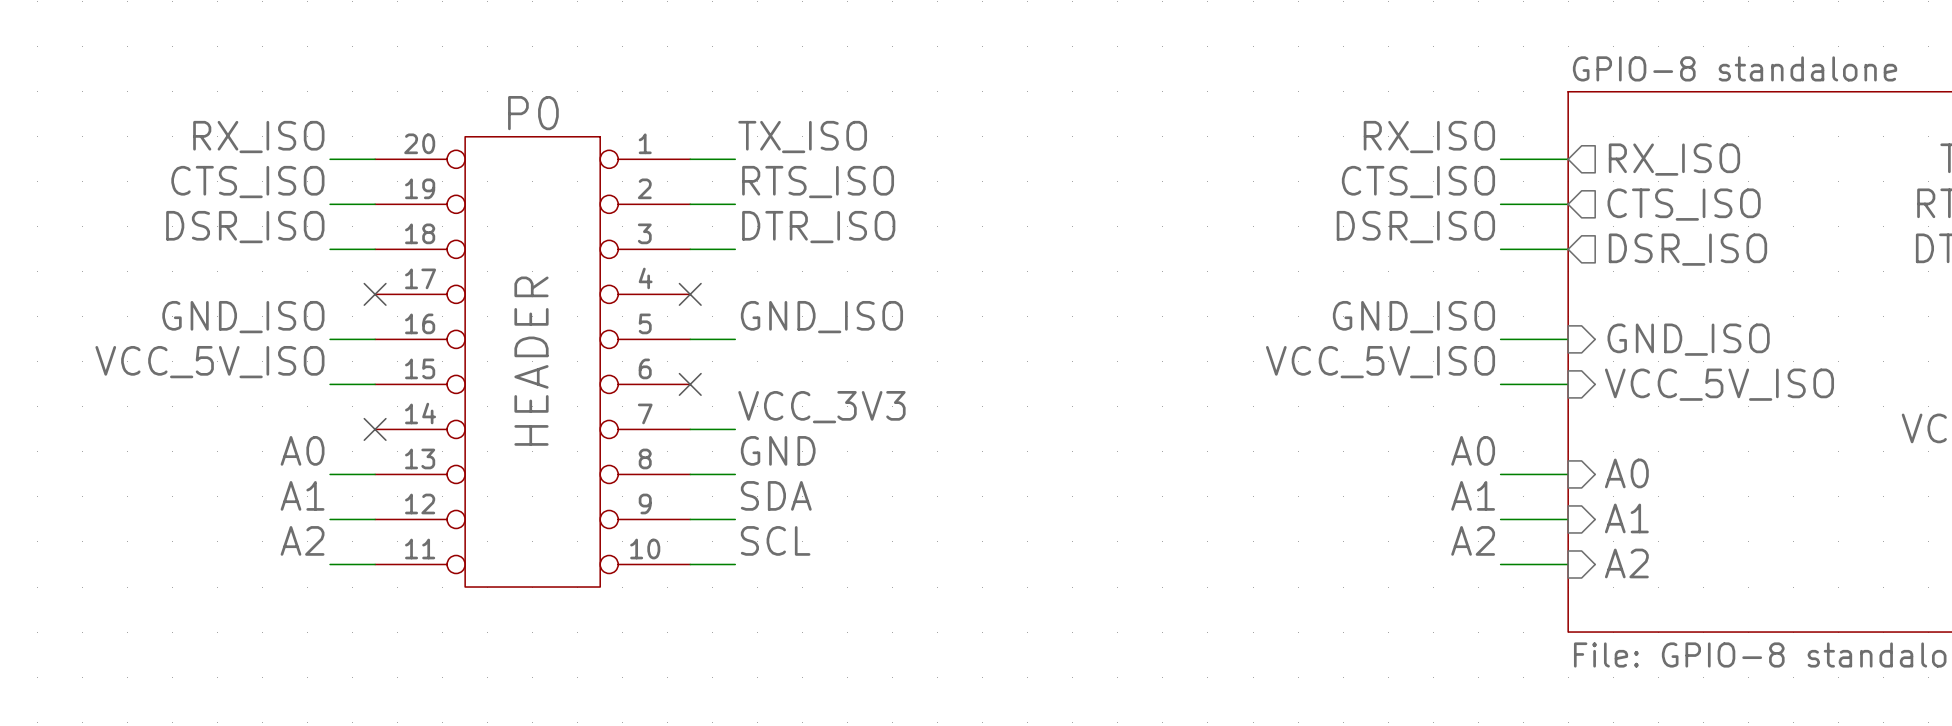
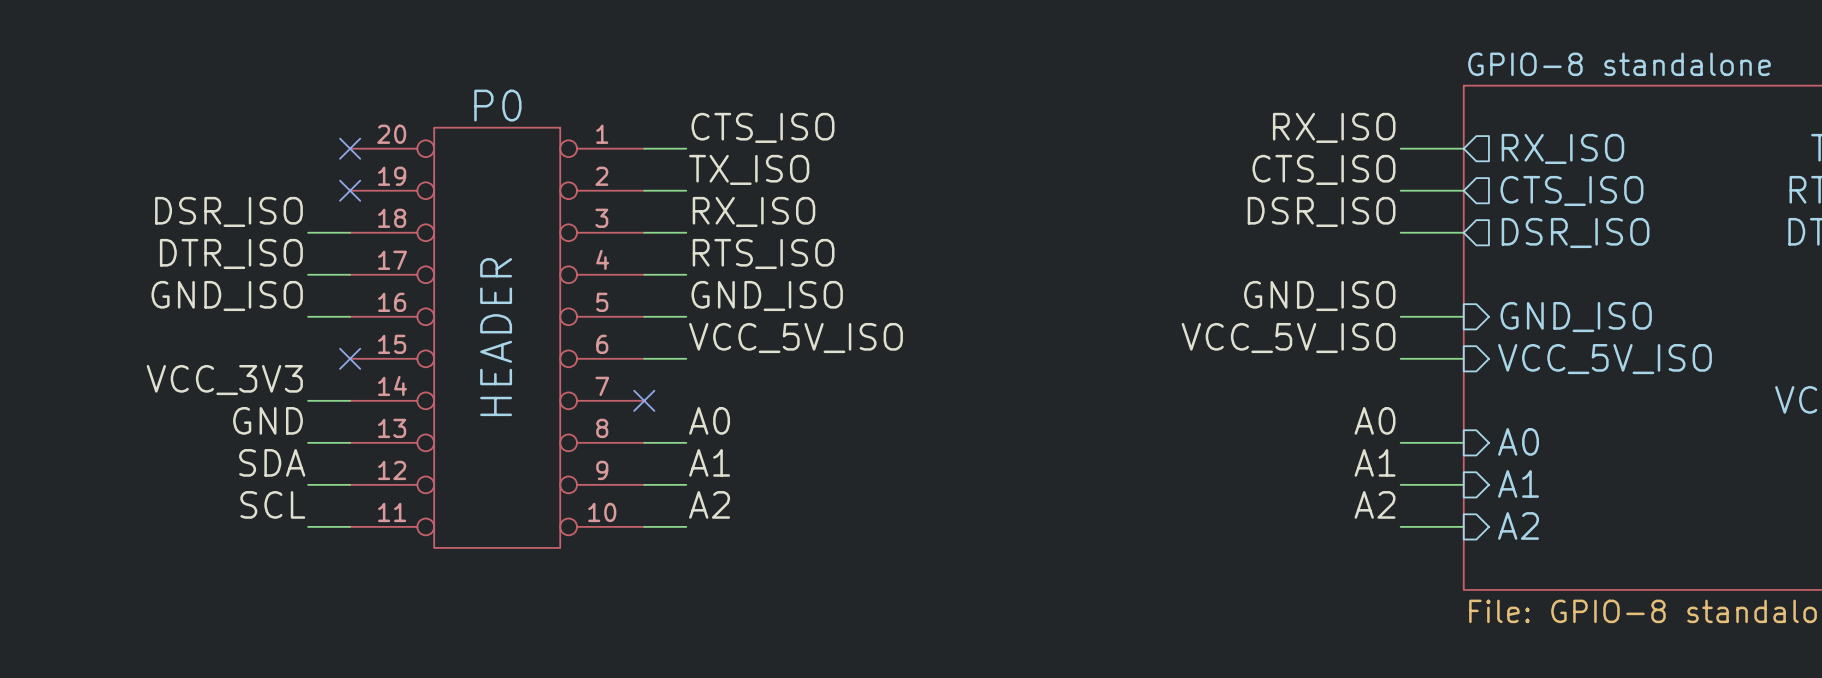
label: RX_ISO (258, 137) -> none
label: TX_ISO (802, 137) -> CTS_ISO (763, 127)
wire: (330, 159) (375, 159) -> (644, 274) (686, 274)
no-connect mark: none -> (350, 148)
label: CTS_ISO (247, 182) -> none
label: RTS_ISO (818, 182) -> TX_ISO (749, 169)
wire: (330, 204) (375, 204) -> (308, 274) (350, 274)
no-connect mark: none -> (350, 190)
label: DTR_ISO (818, 227) -> RX_ISO (754, 211)
label: none -> DTR_ISO (231, 253)
label: none -> RTS_ISO (763, 253)
no-connect mark: (375, 294) -> none
no-connect mark: (690, 294) -> none
label position: VCC_5V_ISO (209, 362) -> VCC_5V_ISO (796, 338)
wire: (330, 384) (375, 384) -> (308, 400) (350, 400)
no-connect mark: none -> (350, 358)
no-connect mark position: (690, 384) -> (644, 400)
label position: VCC_3V3 (821, 407) -> VCC_3V3 (224, 380)
no-connect mark: (375, 429) -> none
wire: (690, 429) (735, 429) -> (644, 358) (686, 358)
label: A0 (302, 450) -> GND (268, 420)
label: GND (778, 450) -> A0 (709, 420)
label: A1 (302, 495) -> SDA (272, 462)
label: SDA (776, 495) -> A1 (709, 462)
label: A2 (302, 540) -> SCL (272, 504)
label: SCL (775, 540) -> A2 (709, 504)

